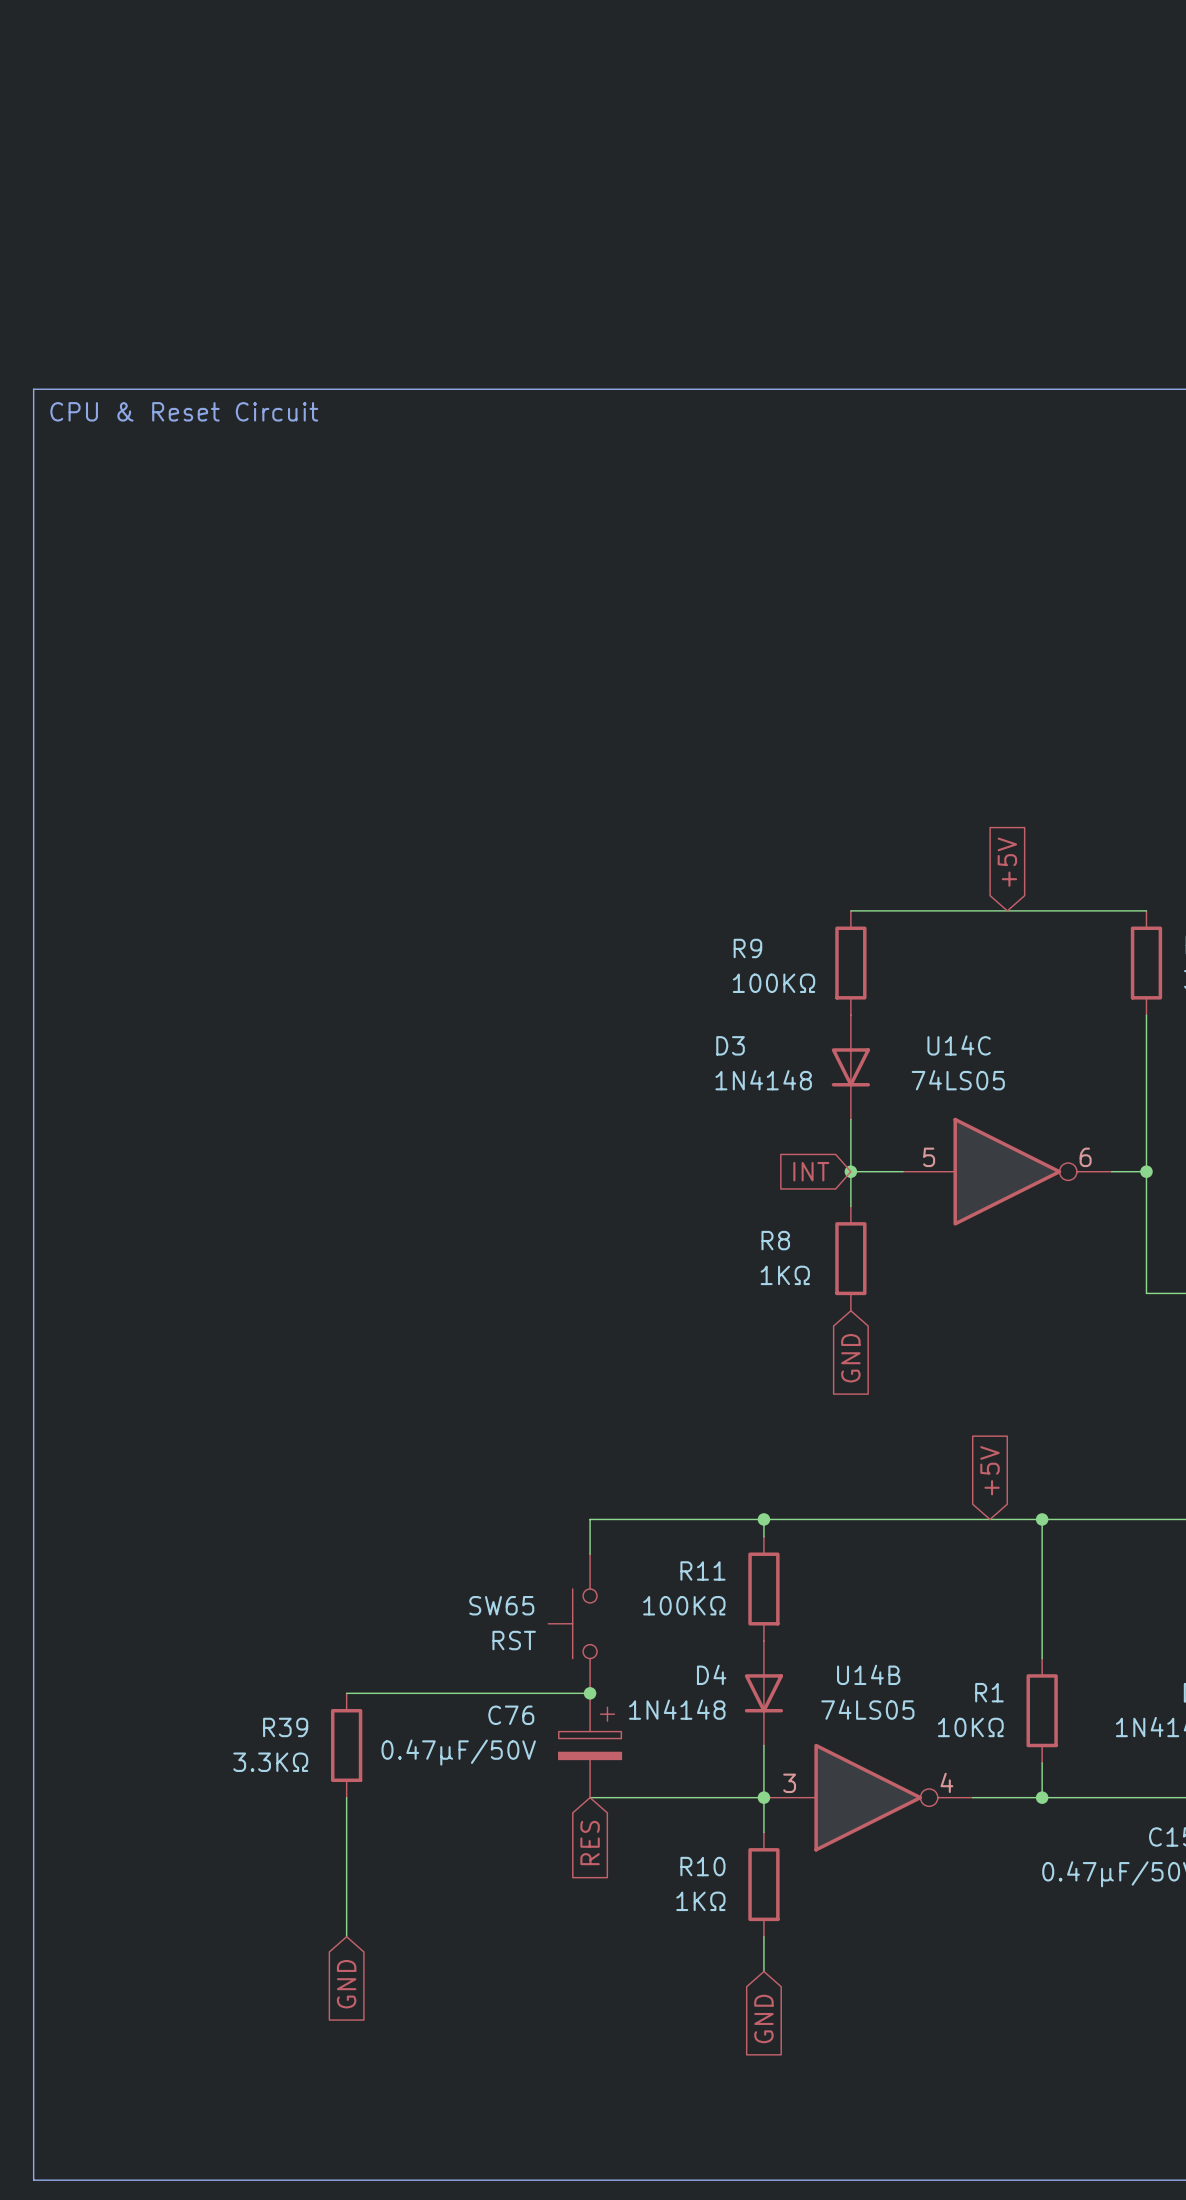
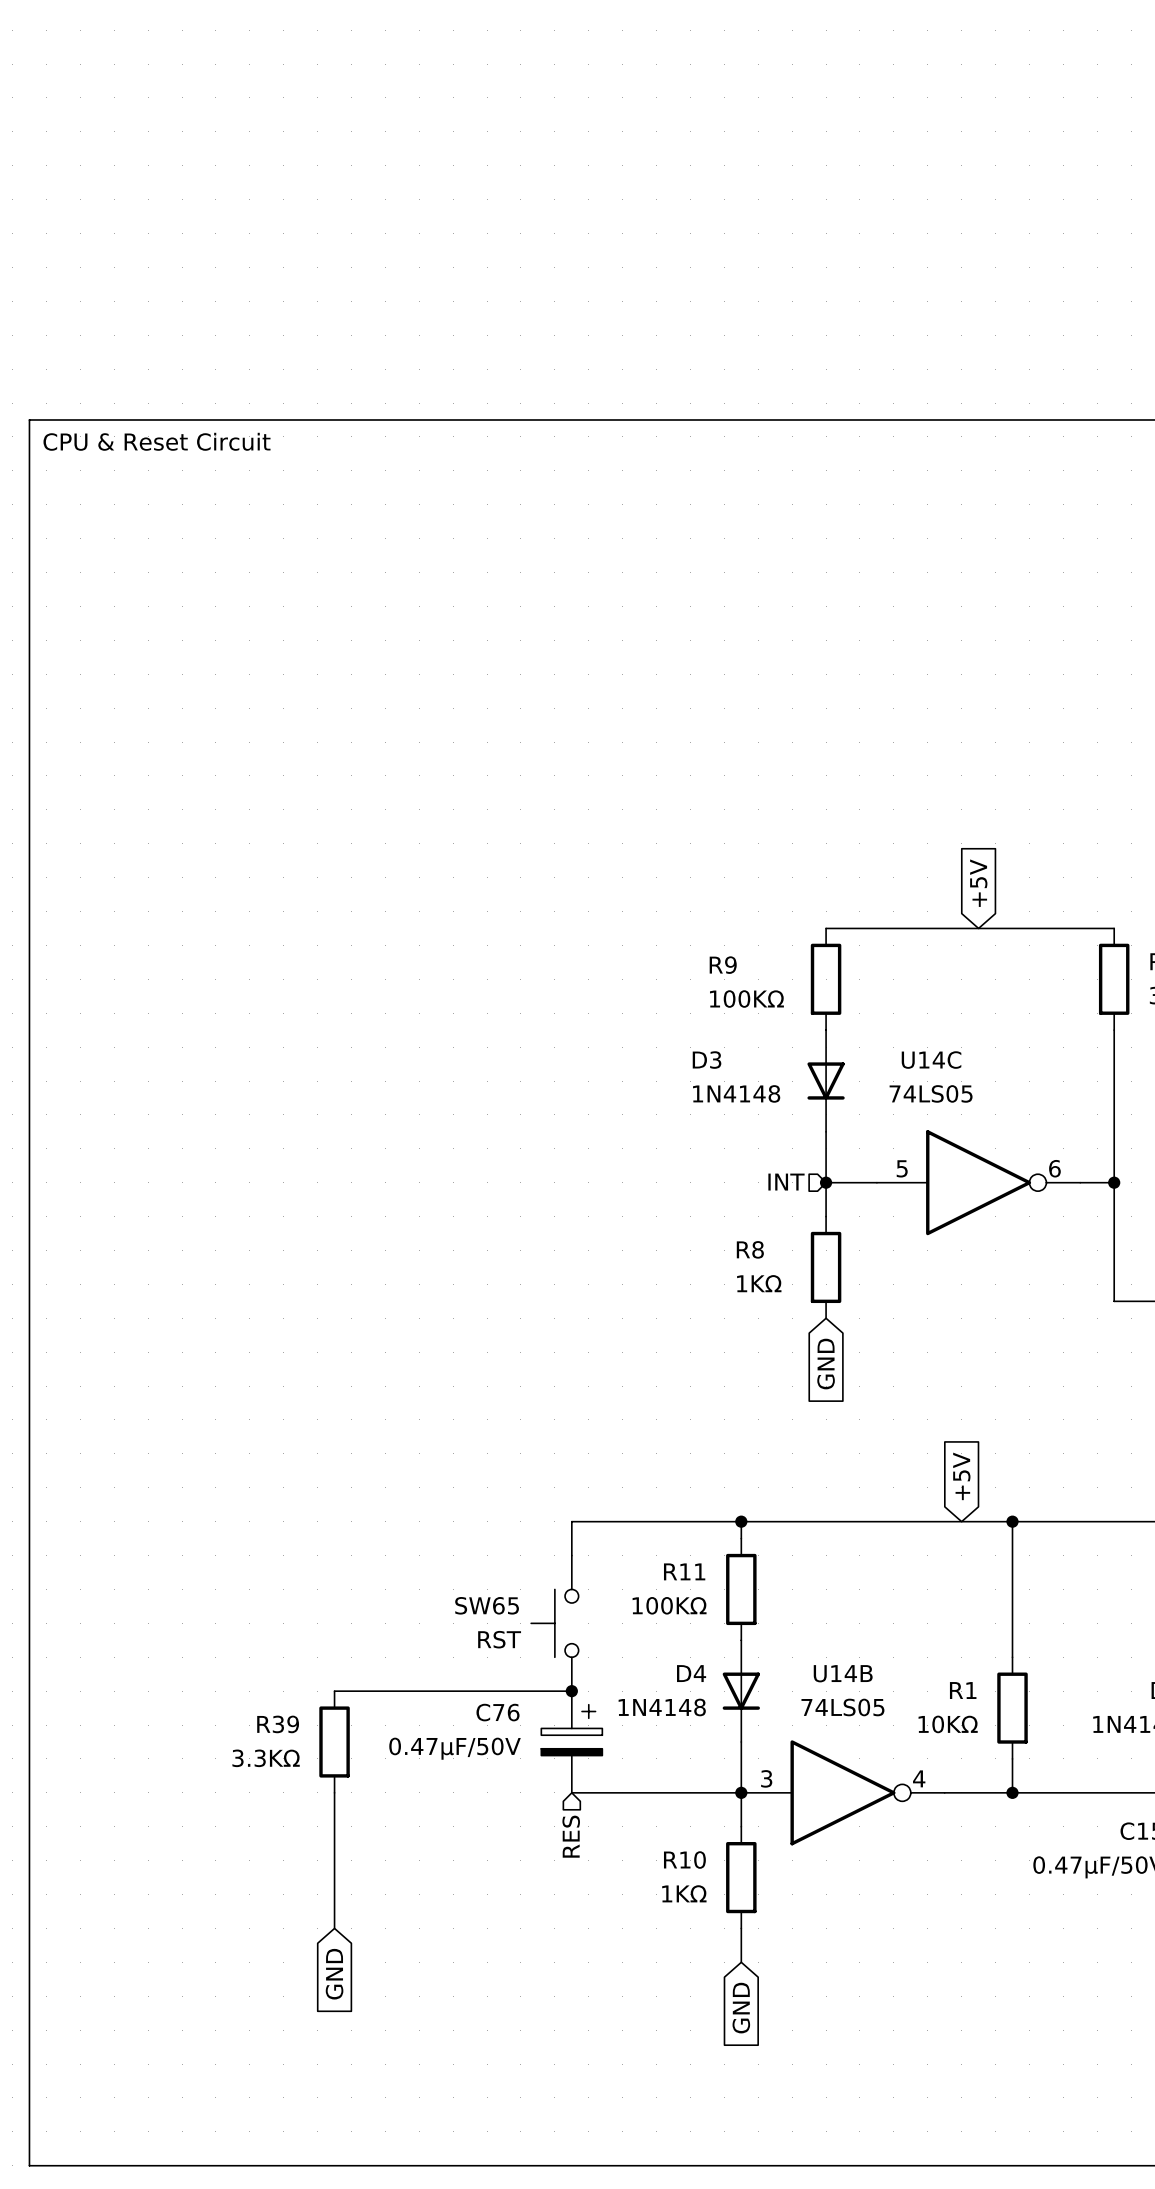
hierarchical label: none -> INT (786, 1182)
global label: INT (811, 1171) -> none
global label: RES (590, 1843) -> none
hierarchical label: none -> RES (571, 1836)

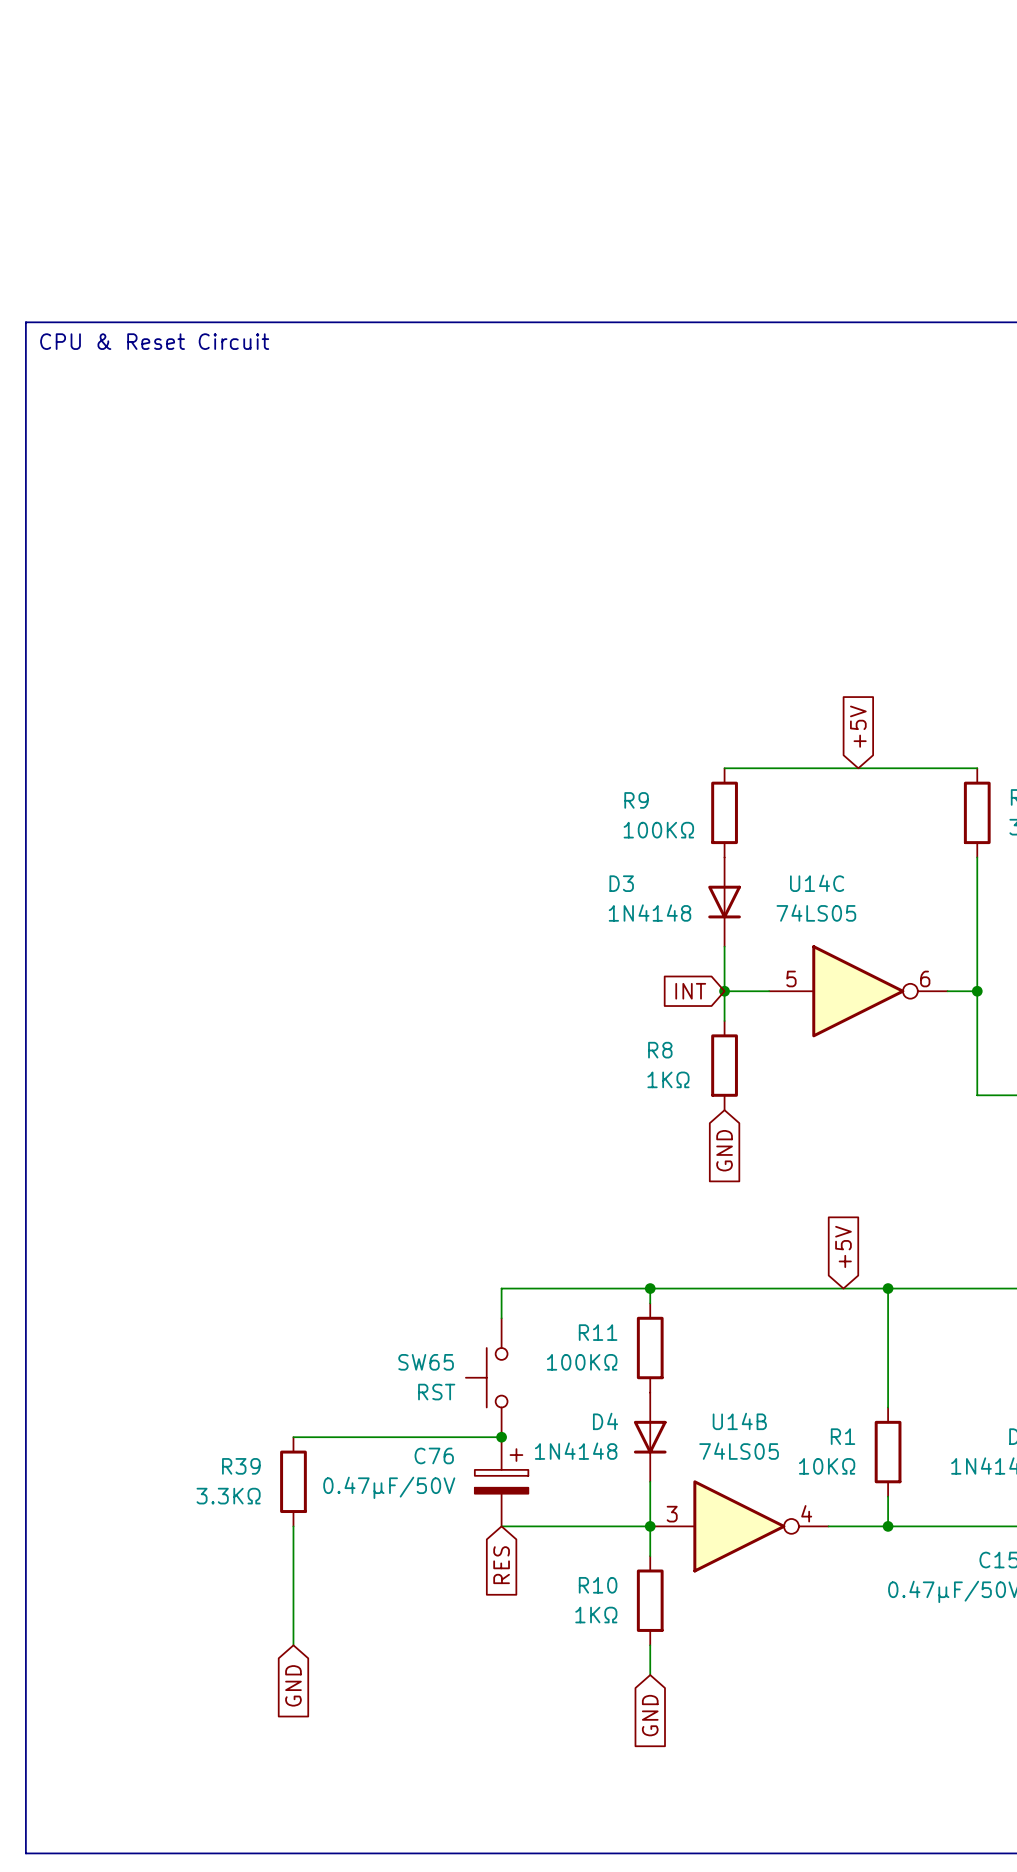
hierarchical label: INT (786, 1182) -> none
global label: none -> INT (690, 991)
global label: none -> RES (501, 1565)
hierarchical label: RES (571, 1836) -> none

